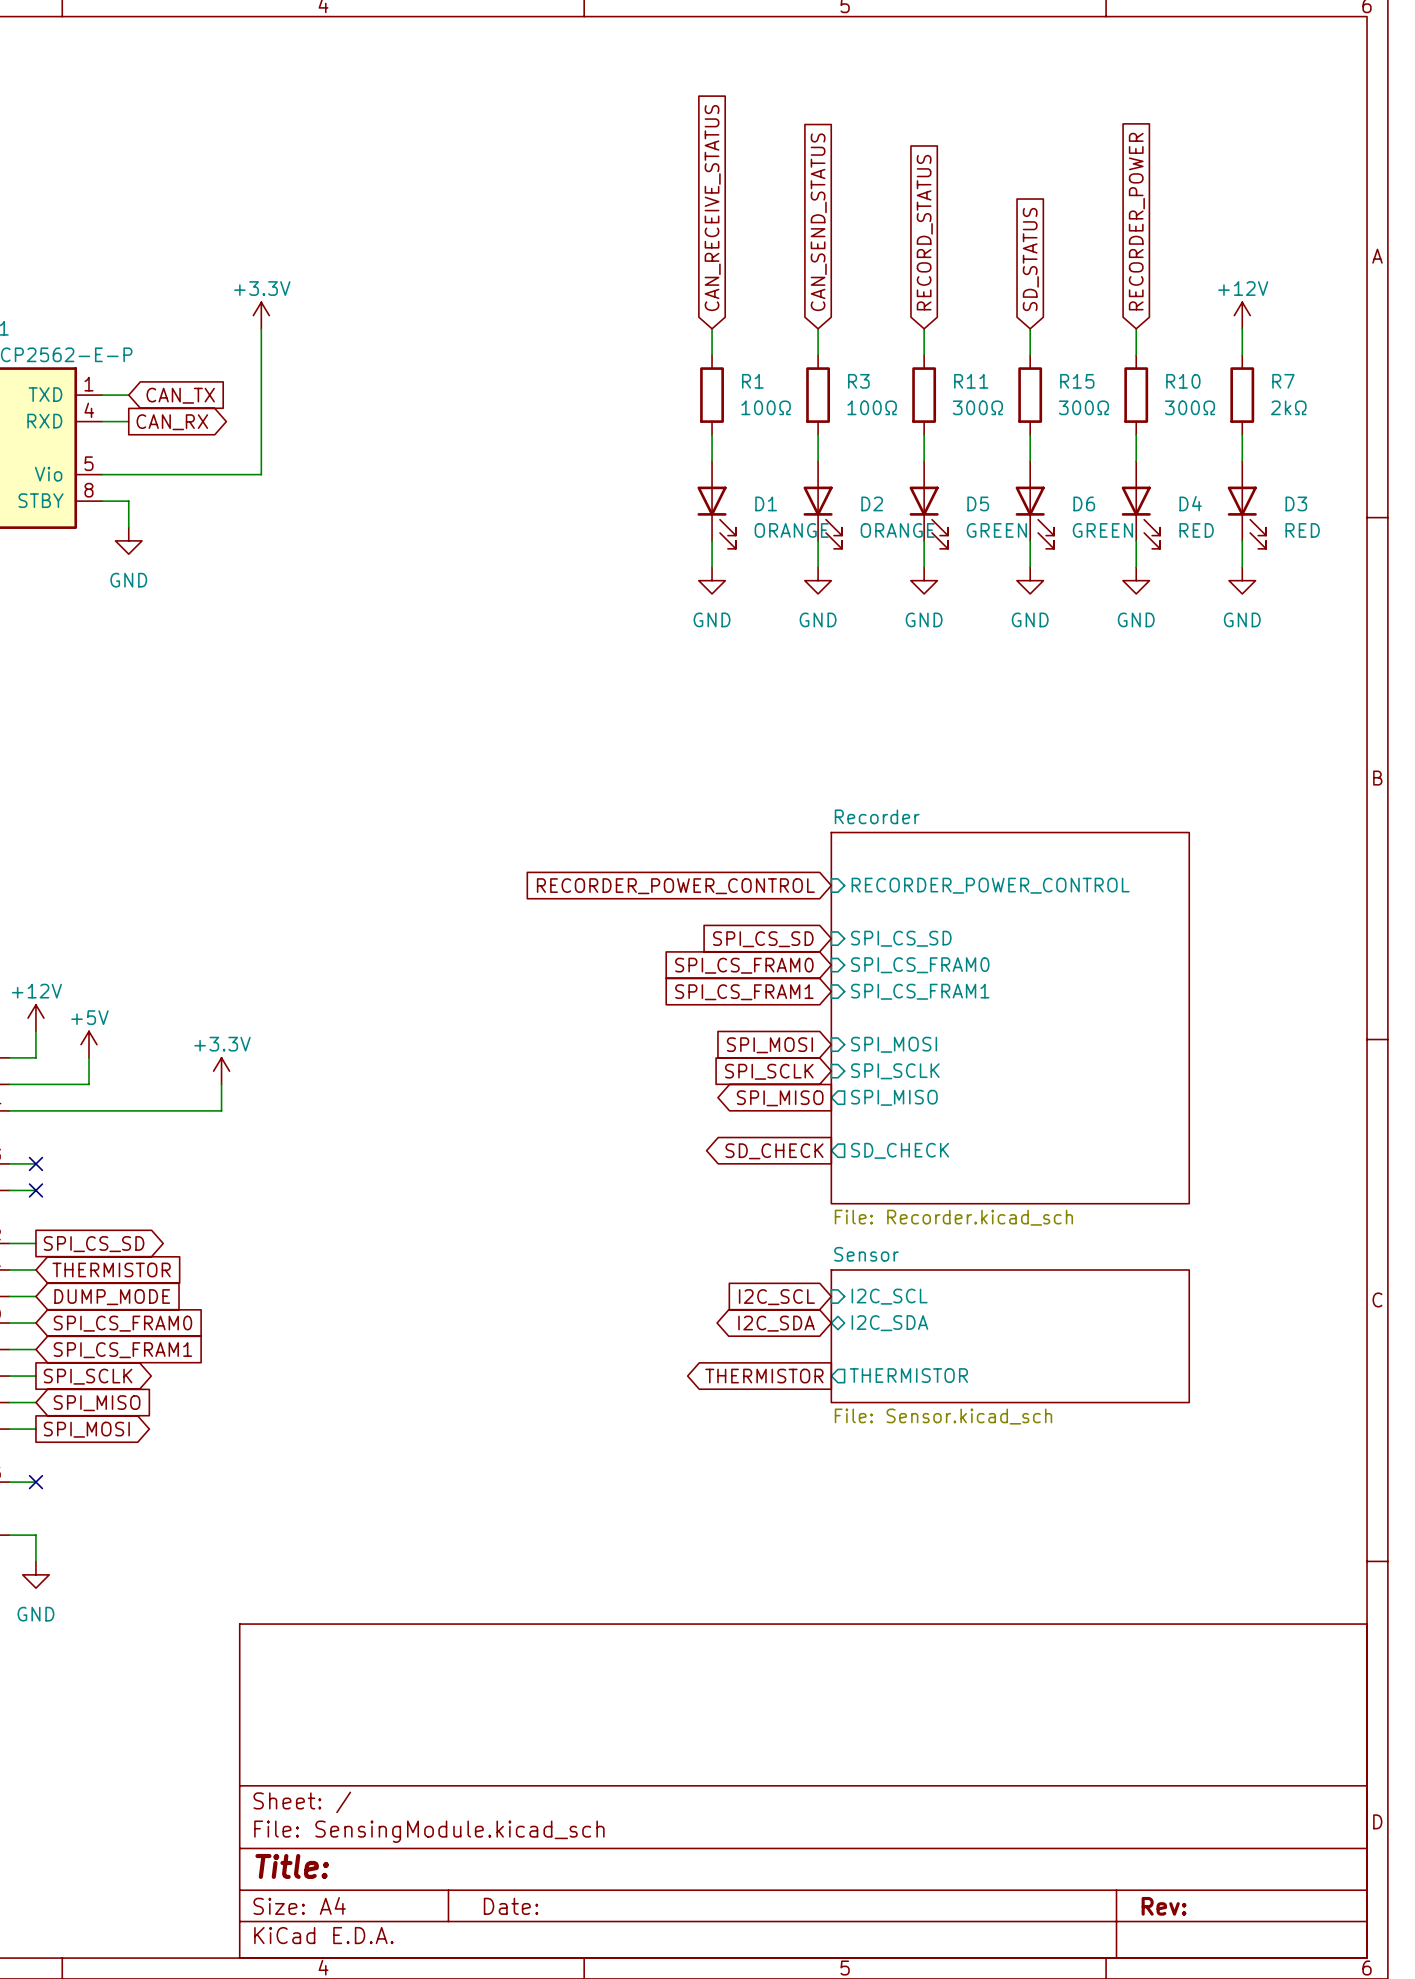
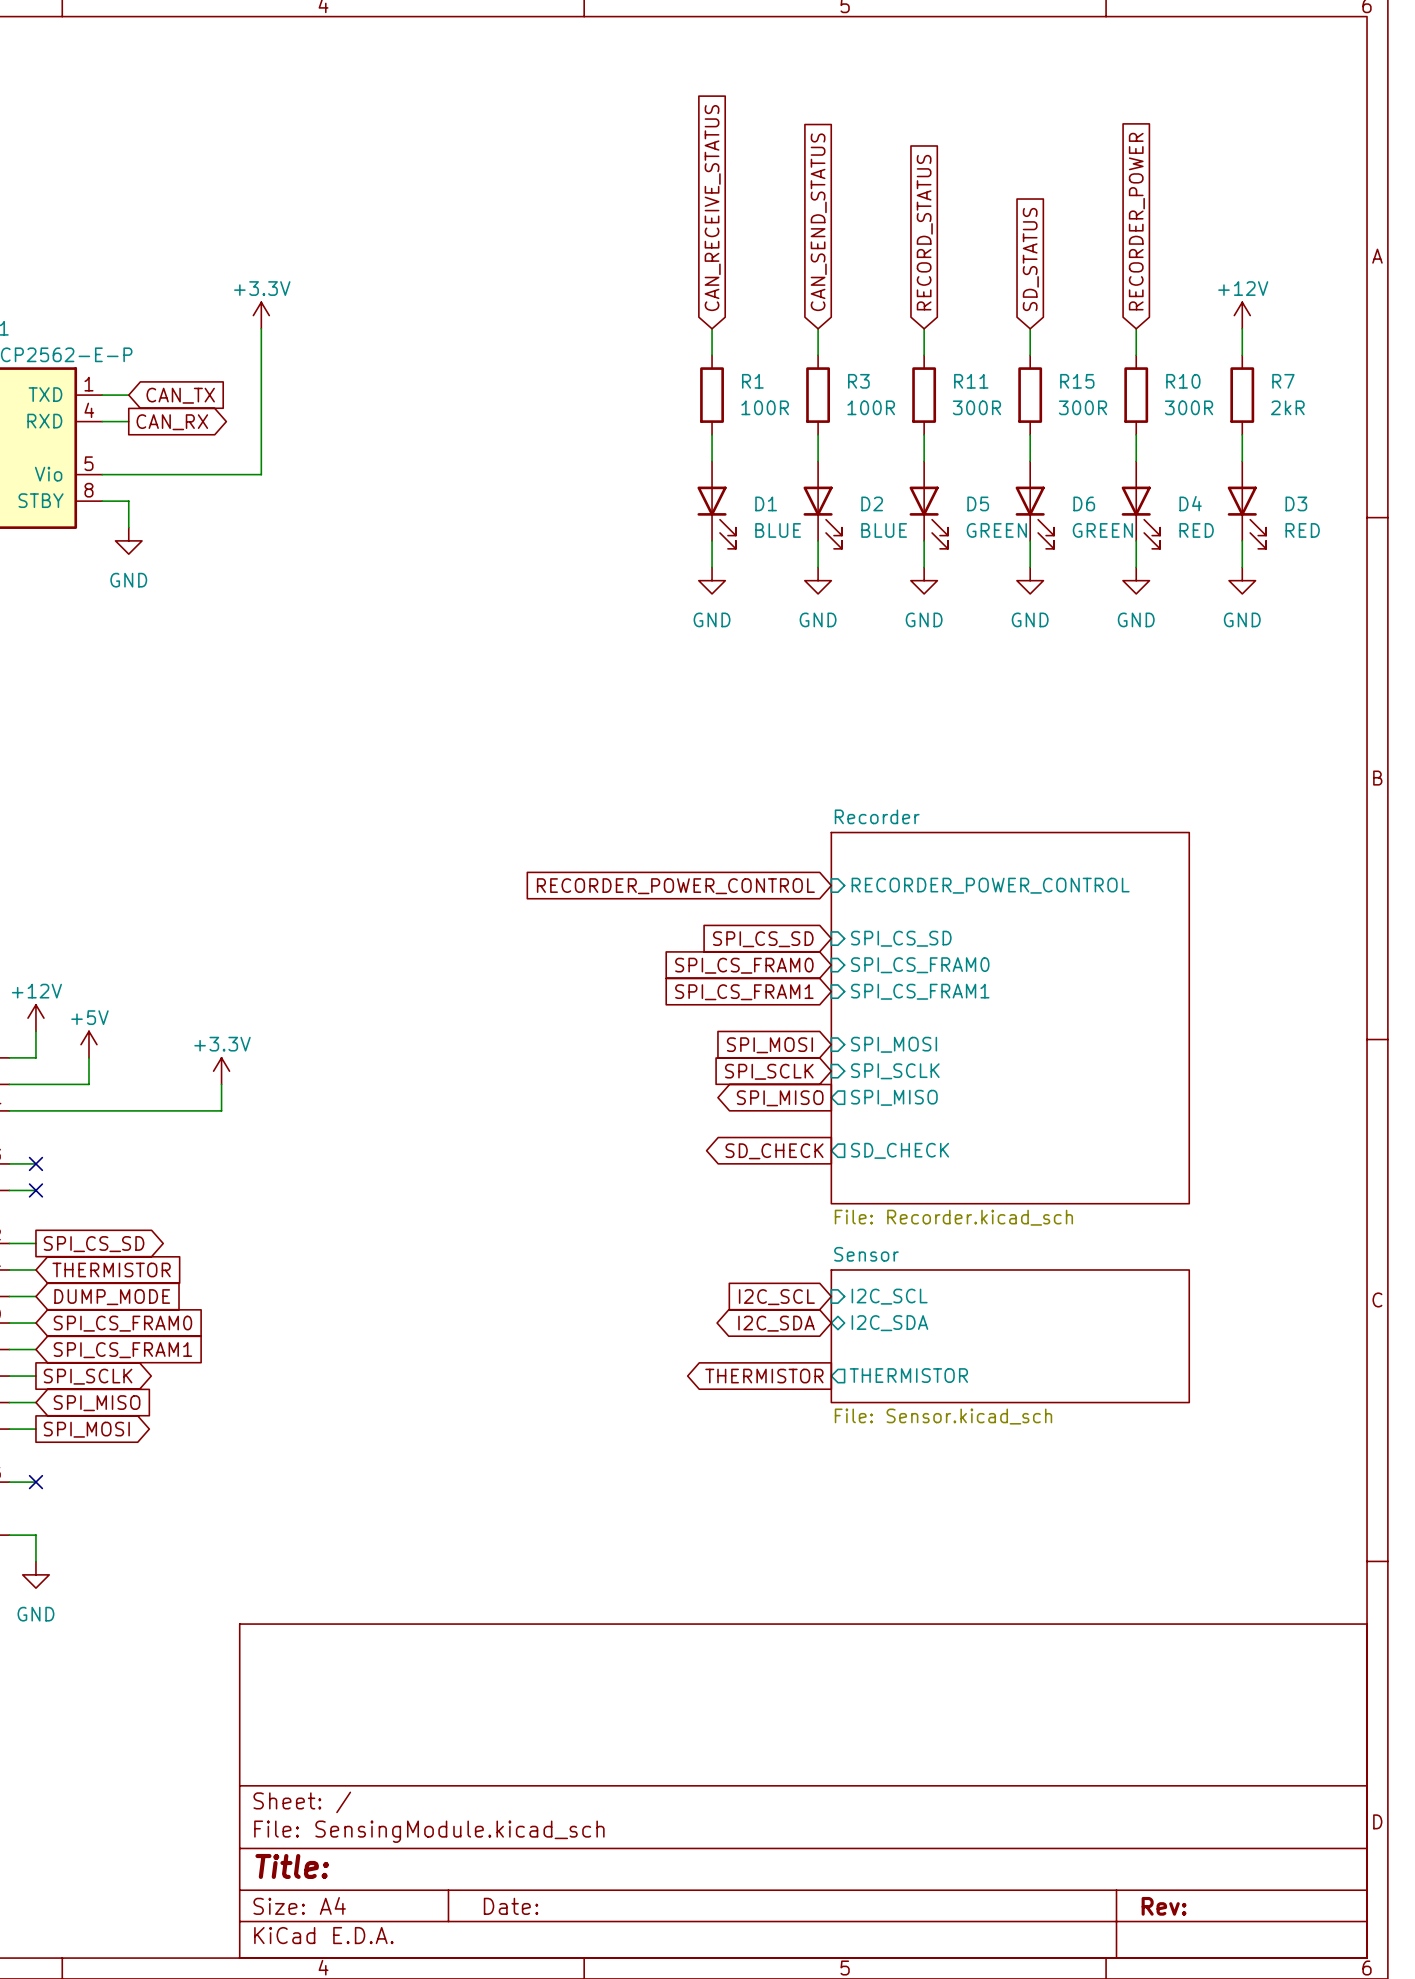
R1 value: 100Ω (766, 407) -> 100R (765, 407)
R3 value: 100Ω (872, 407) -> 100R (871, 407)
R11 value: 300Ω (977, 407) -> 300R (976, 407)
R15 value: 300Ω (1083, 407) -> 300R (1082, 407)
R10 value: 300Ω (1189, 407) -> 300R (1189, 407)
R7 value: 2kΩ (1288, 407) -> 2kR (1287, 407)
D1 value: ORANGE (791, 530) -> BLUE (778, 530)
D2 value: ORANGE (897, 530) -> BLUE (884, 530)

